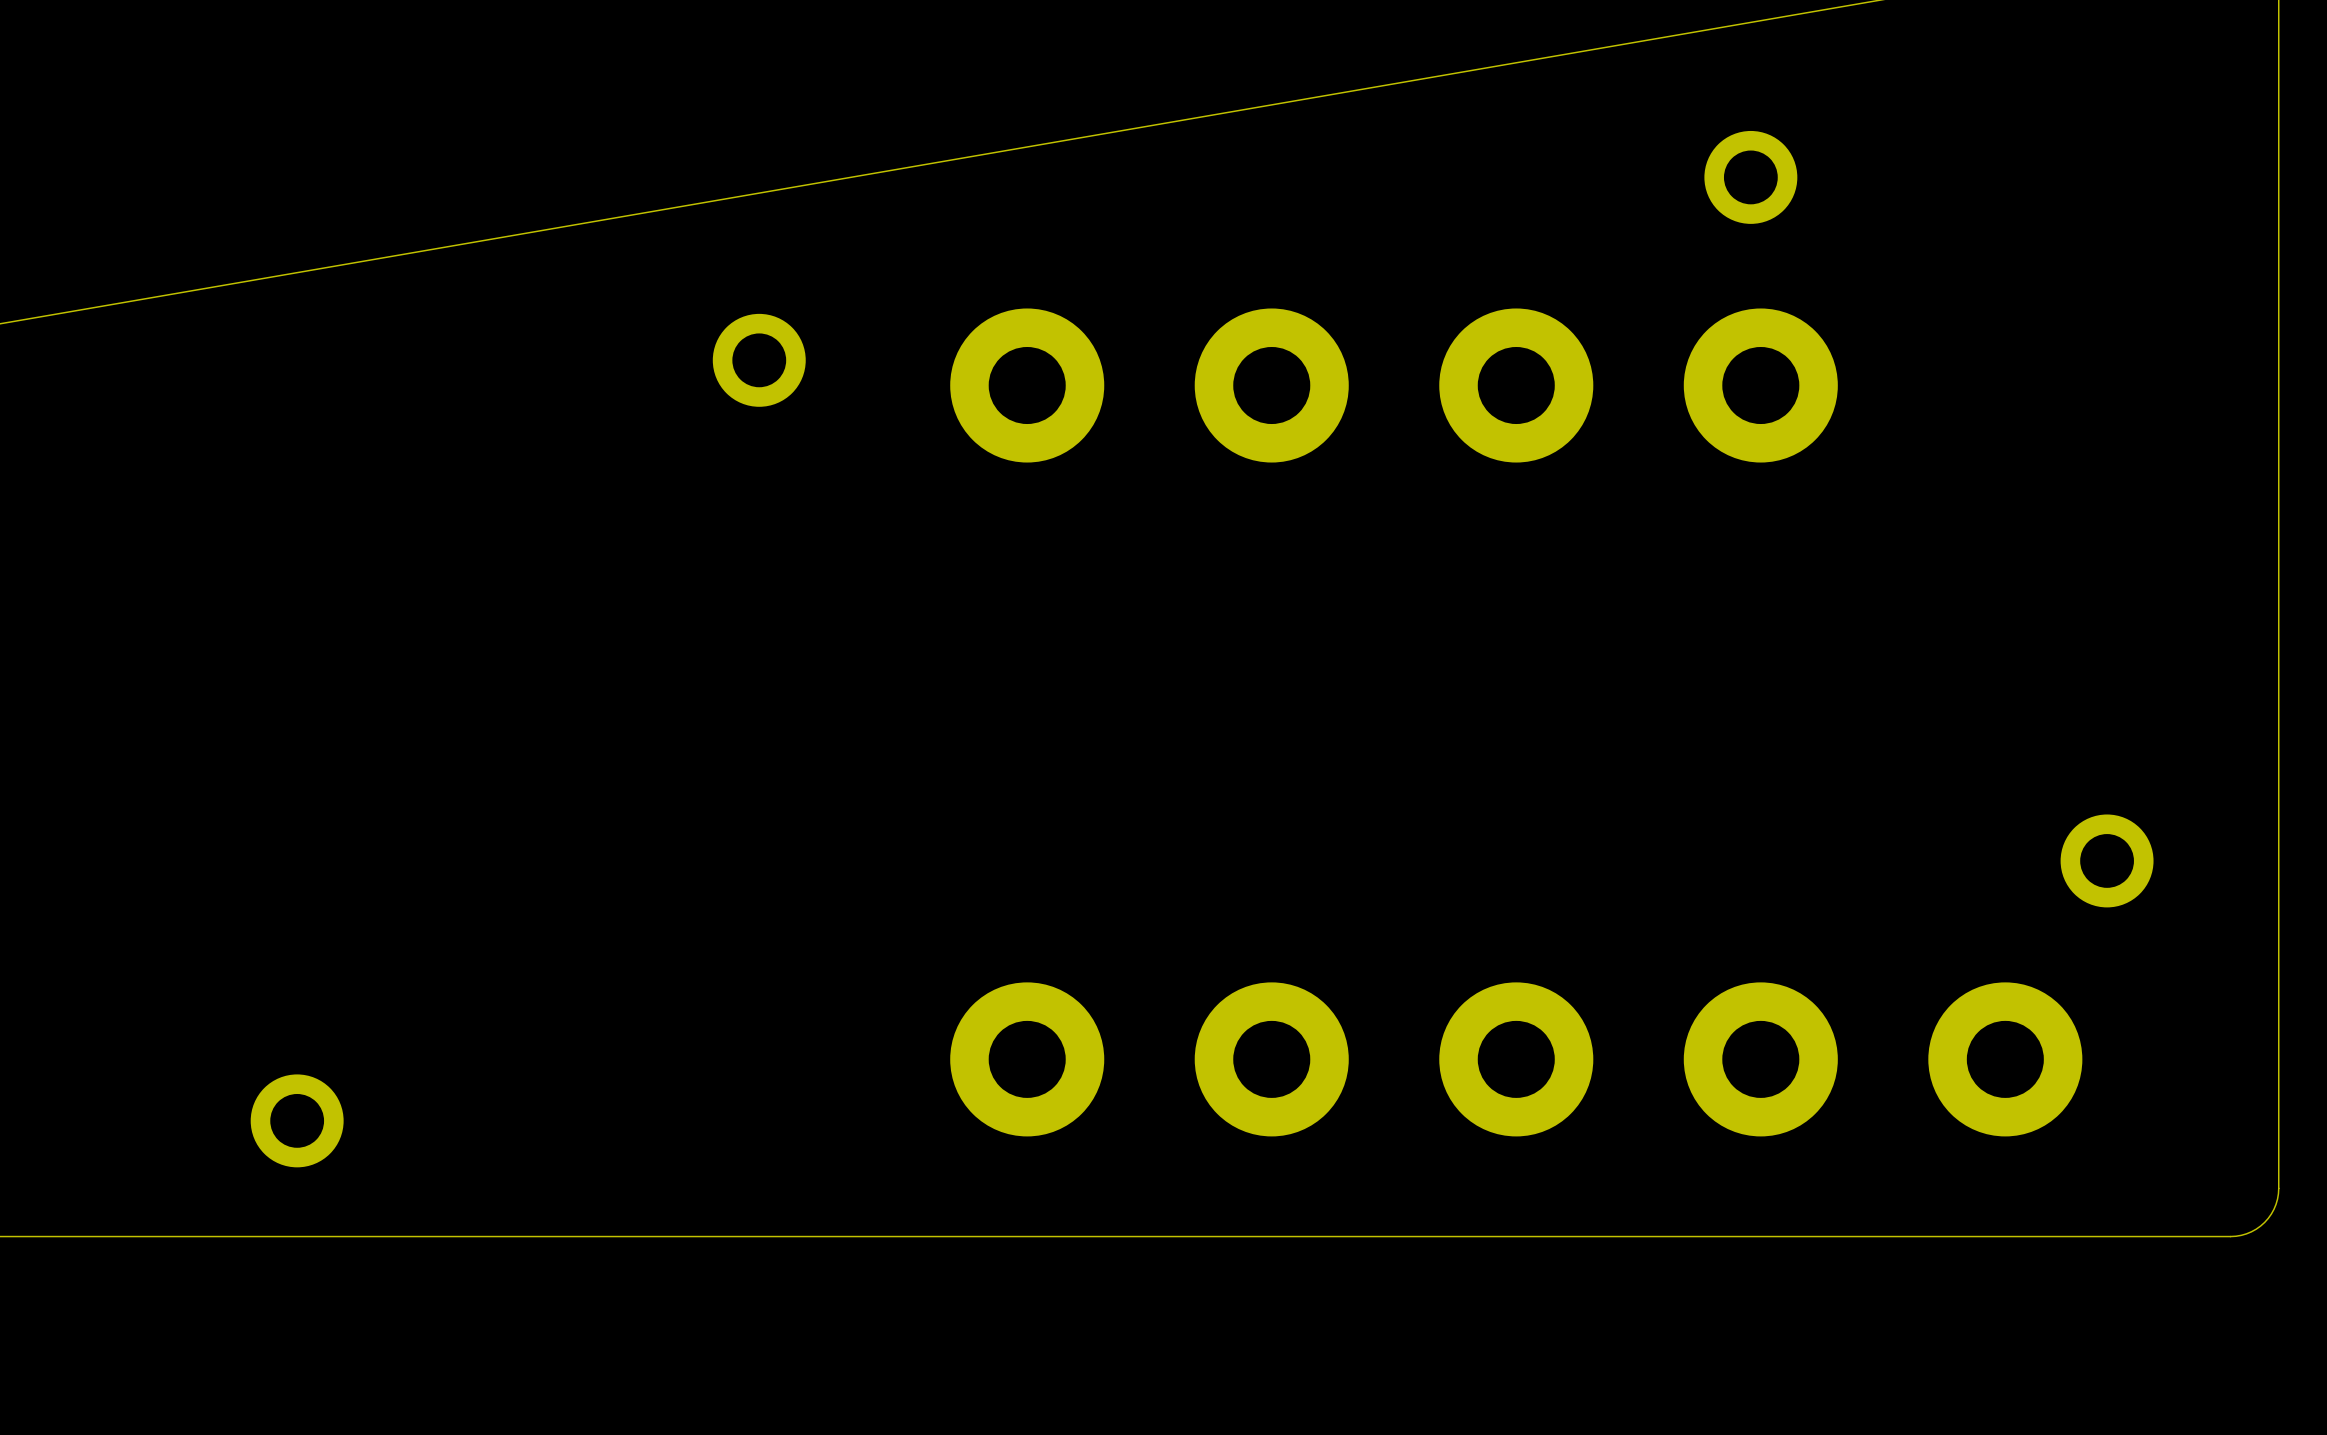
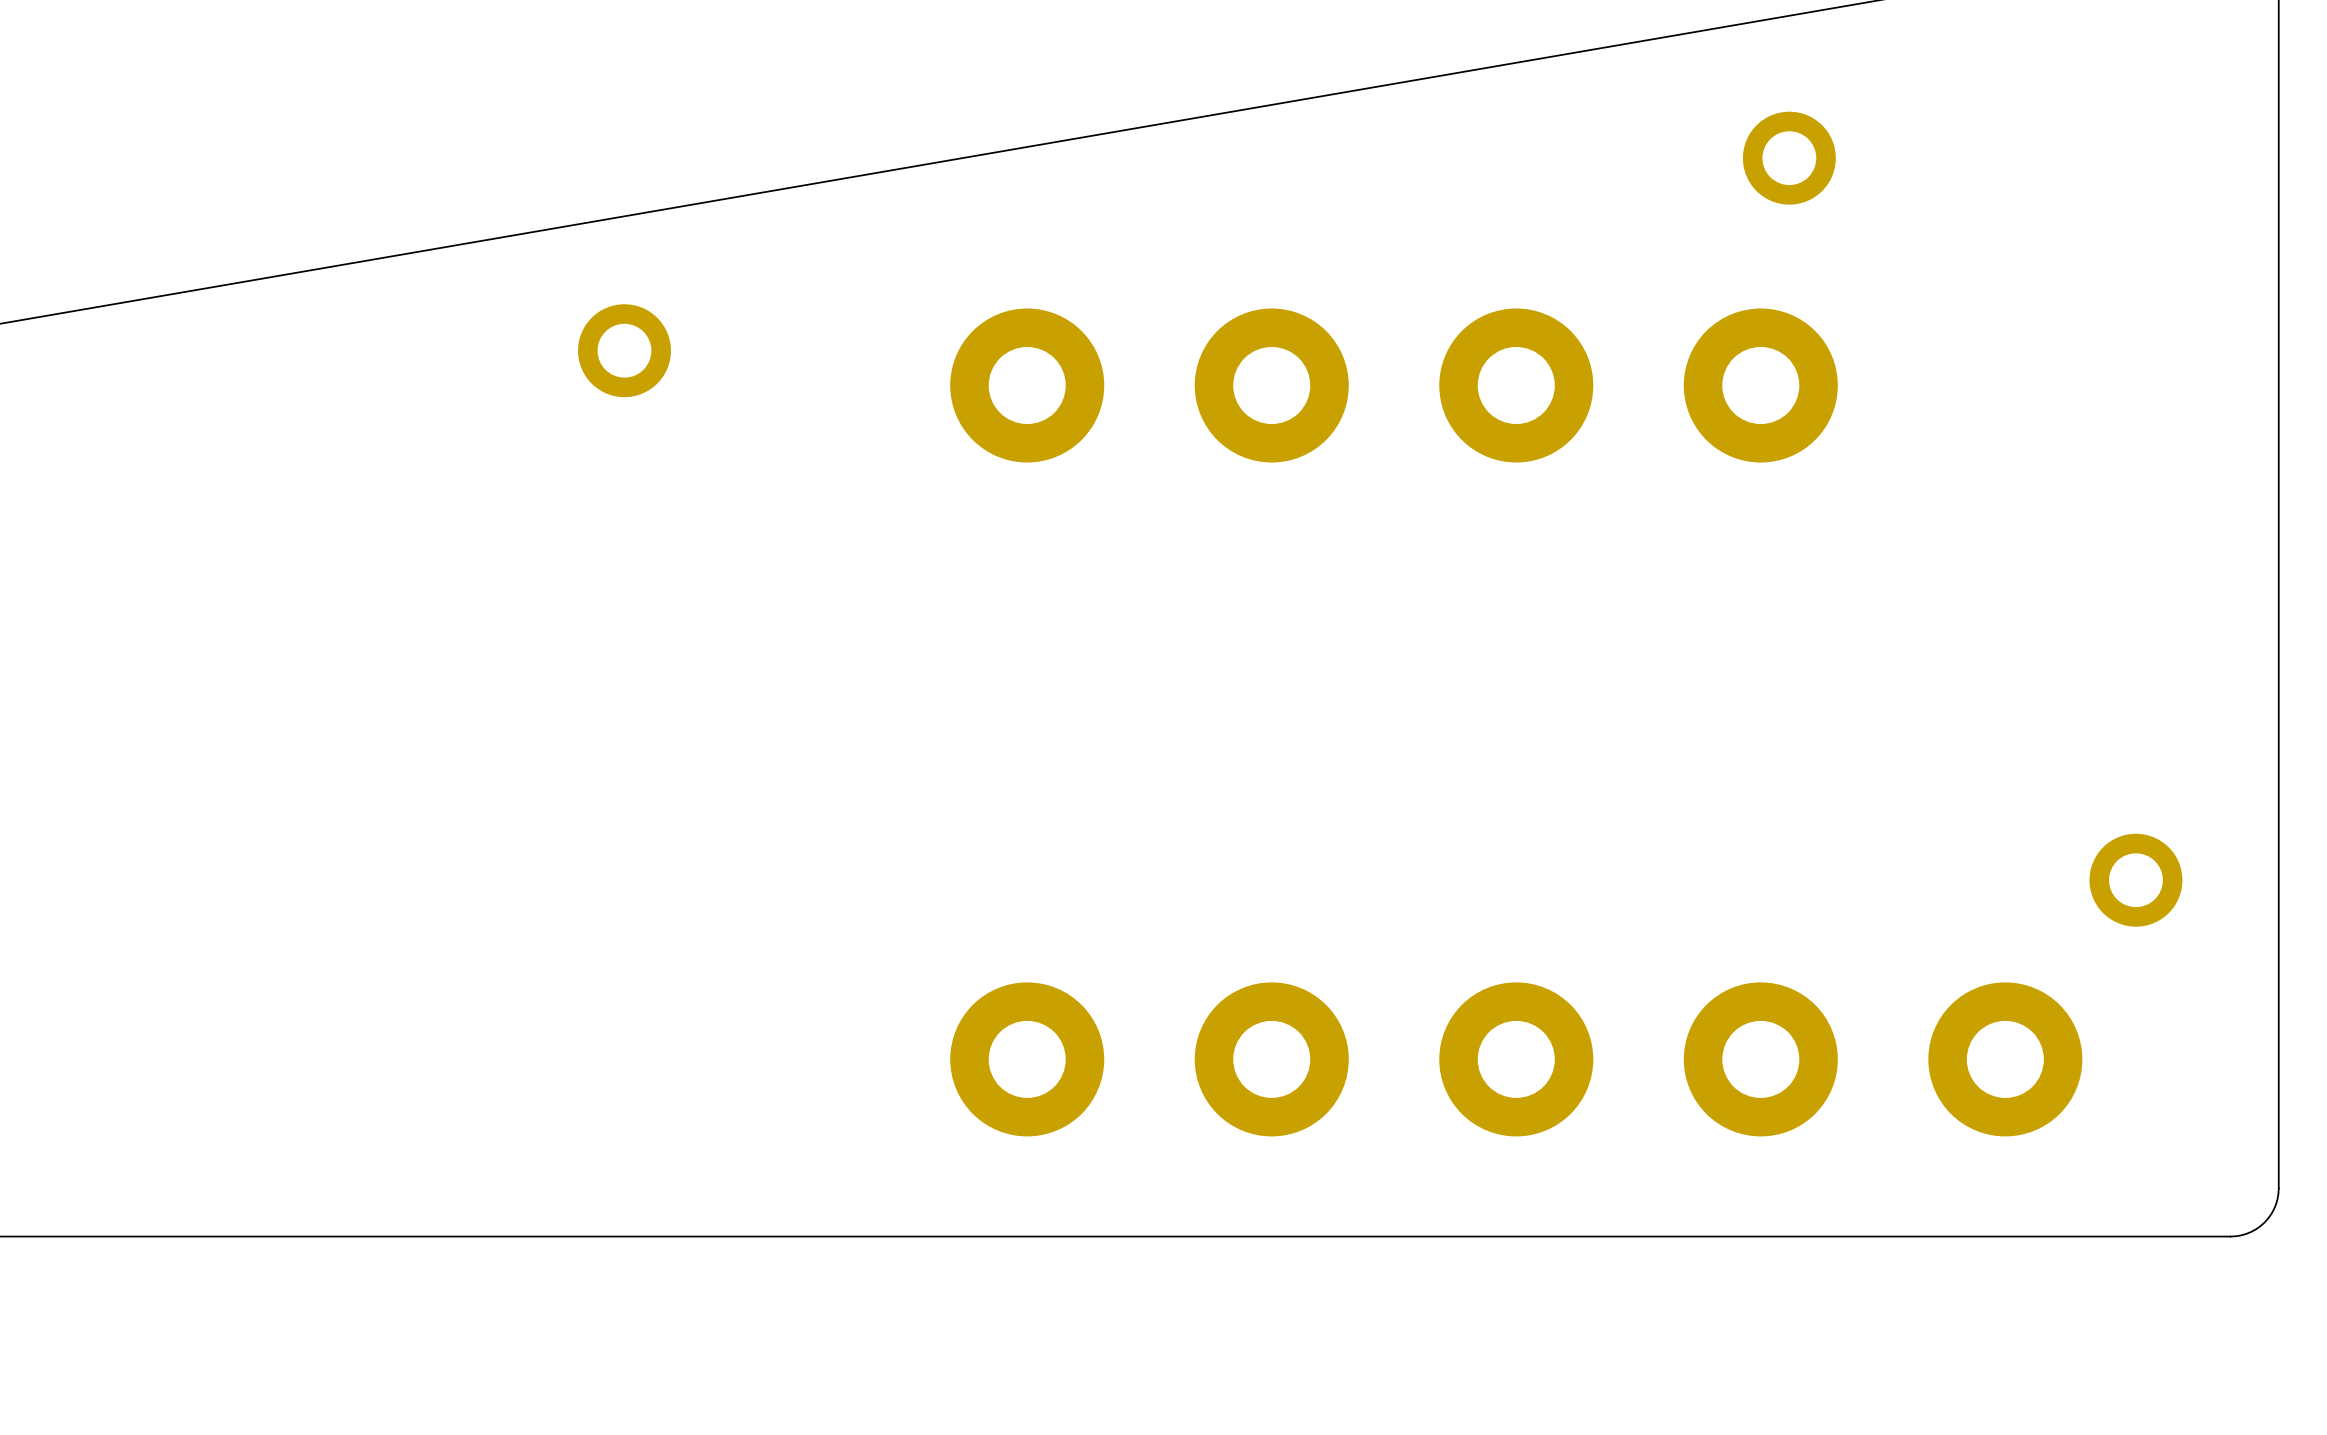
part position: (1750, 177) -> (1789, 158)
part position: (759, 360) -> (624, 350)
part position: (2107, 860) -> (2135, 880)
part: (297, 1120) -> none

